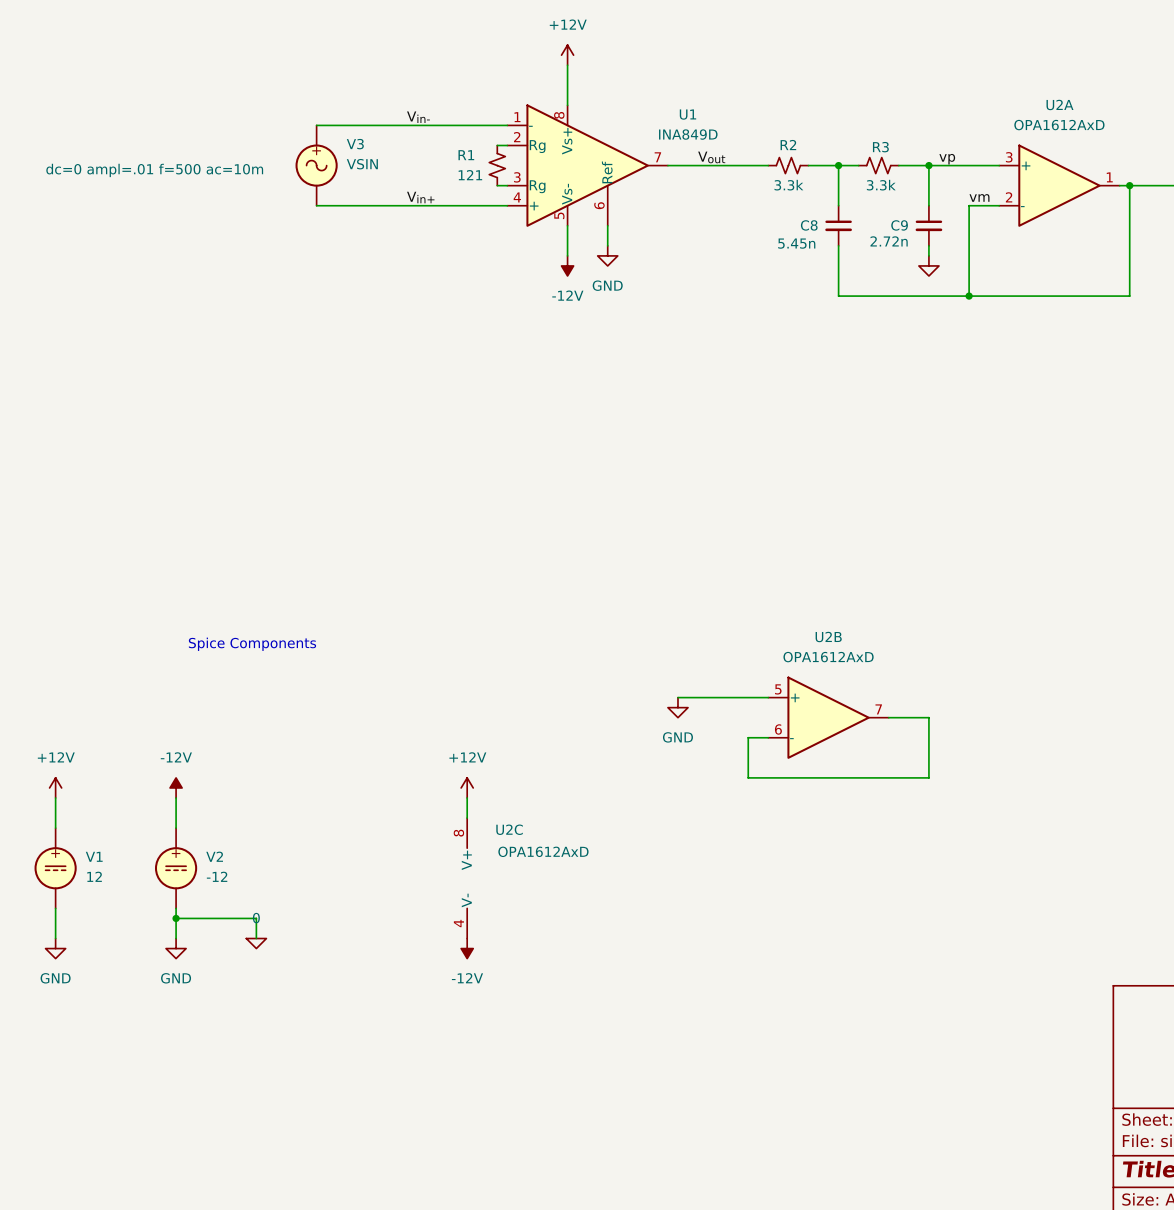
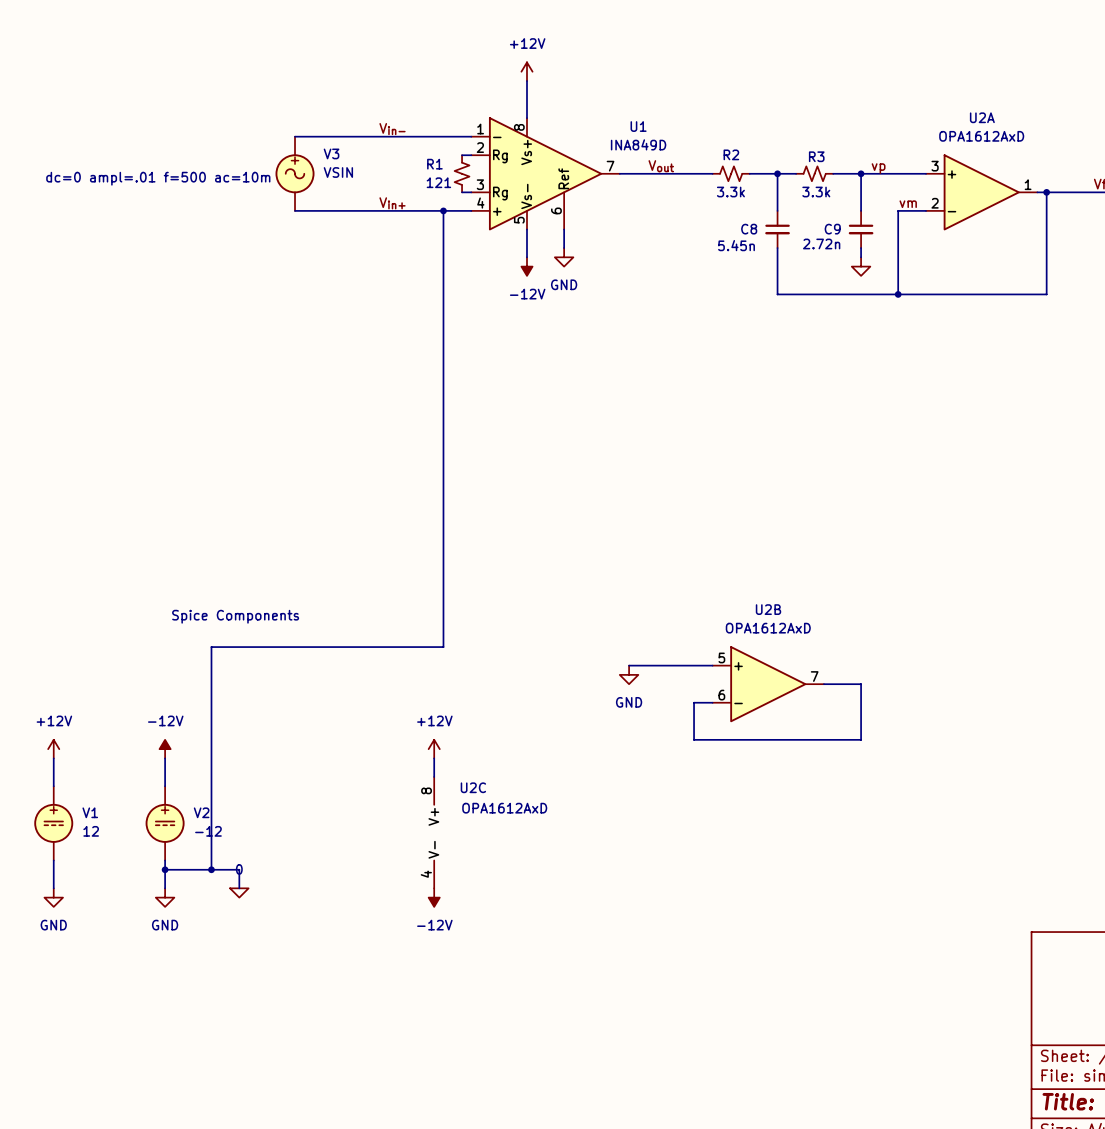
wire: none -> (443, 210) (443, 647) (211, 647) (211, 869)
junction: none -> (443, 210)
junction: none -> (211, 869)

